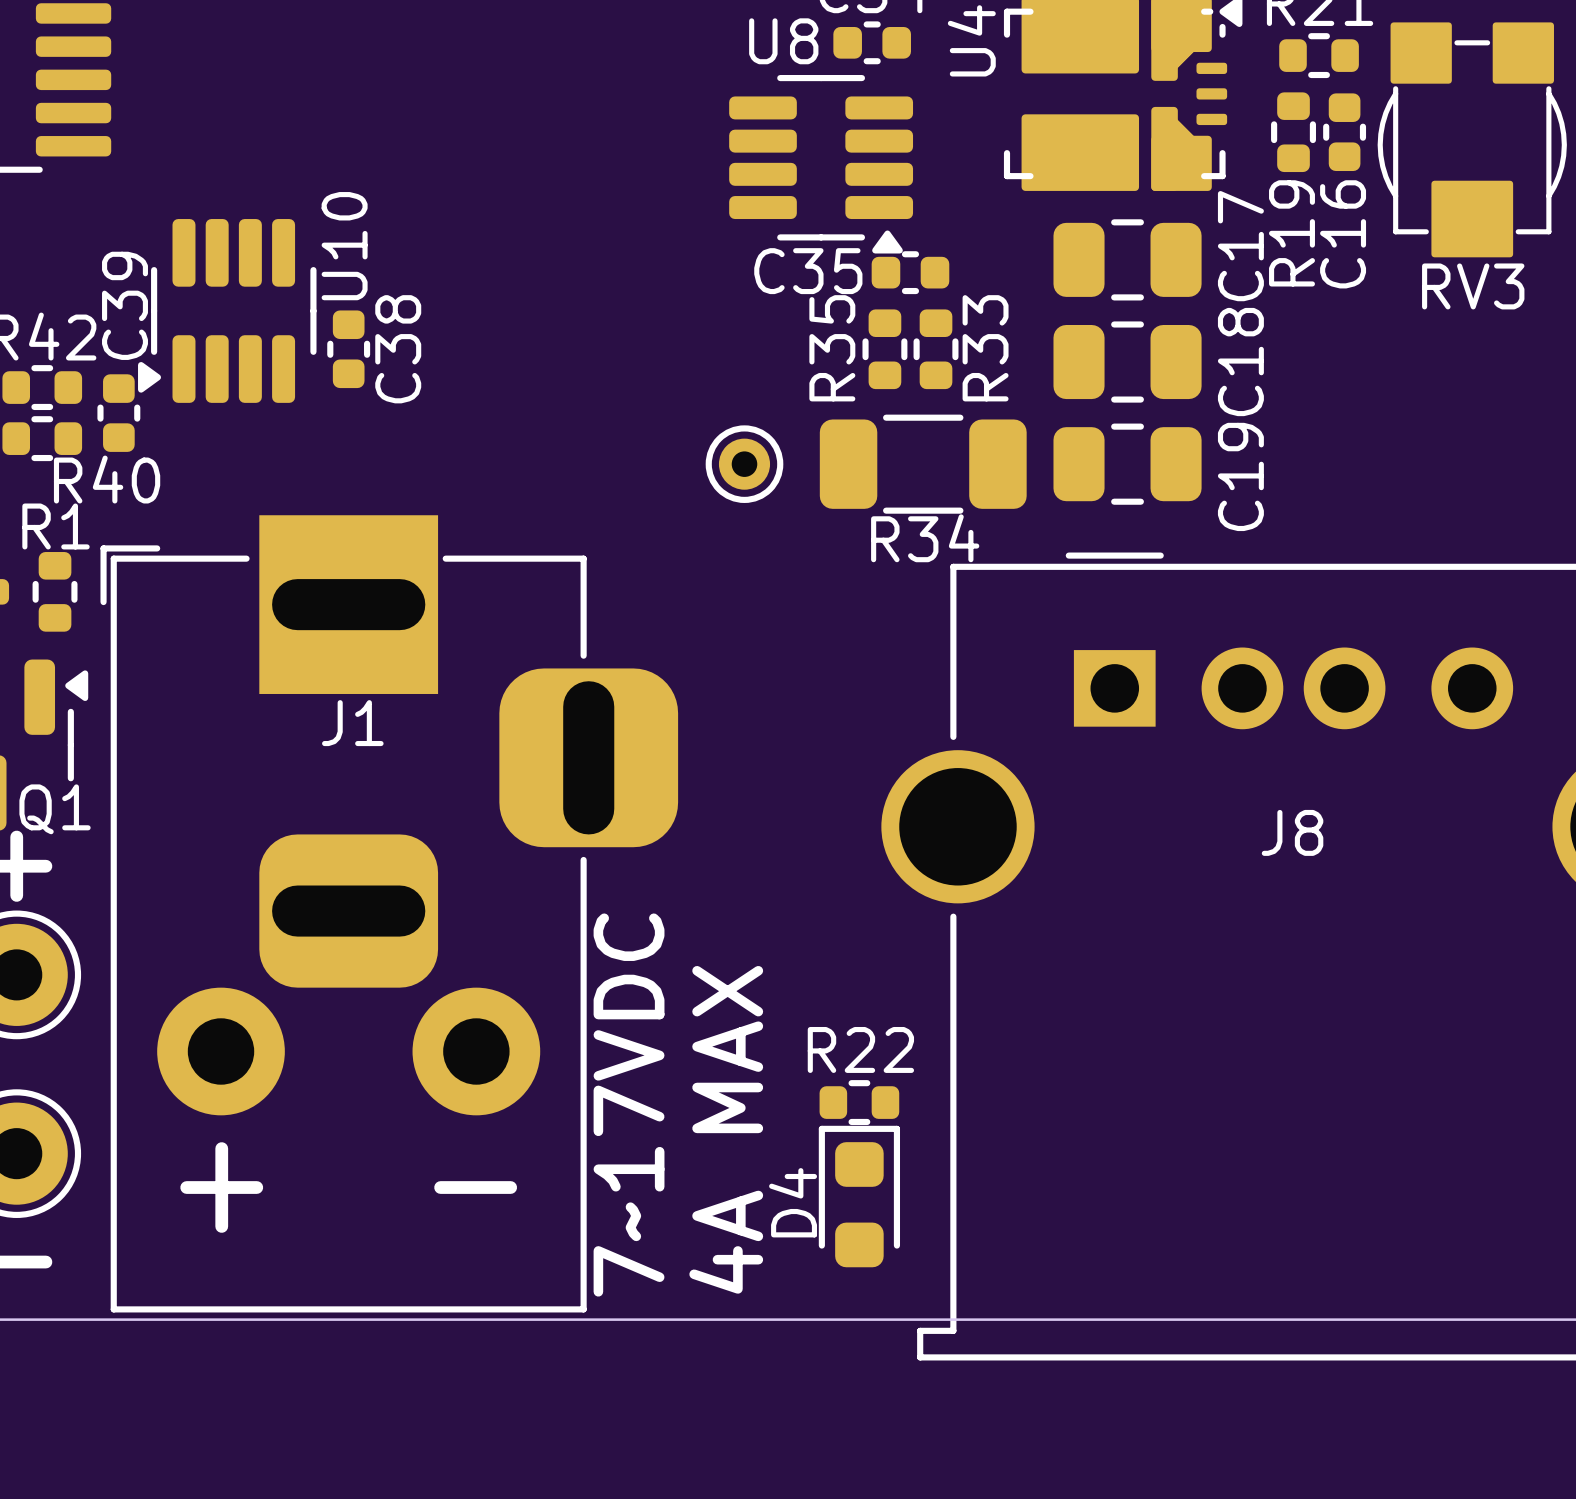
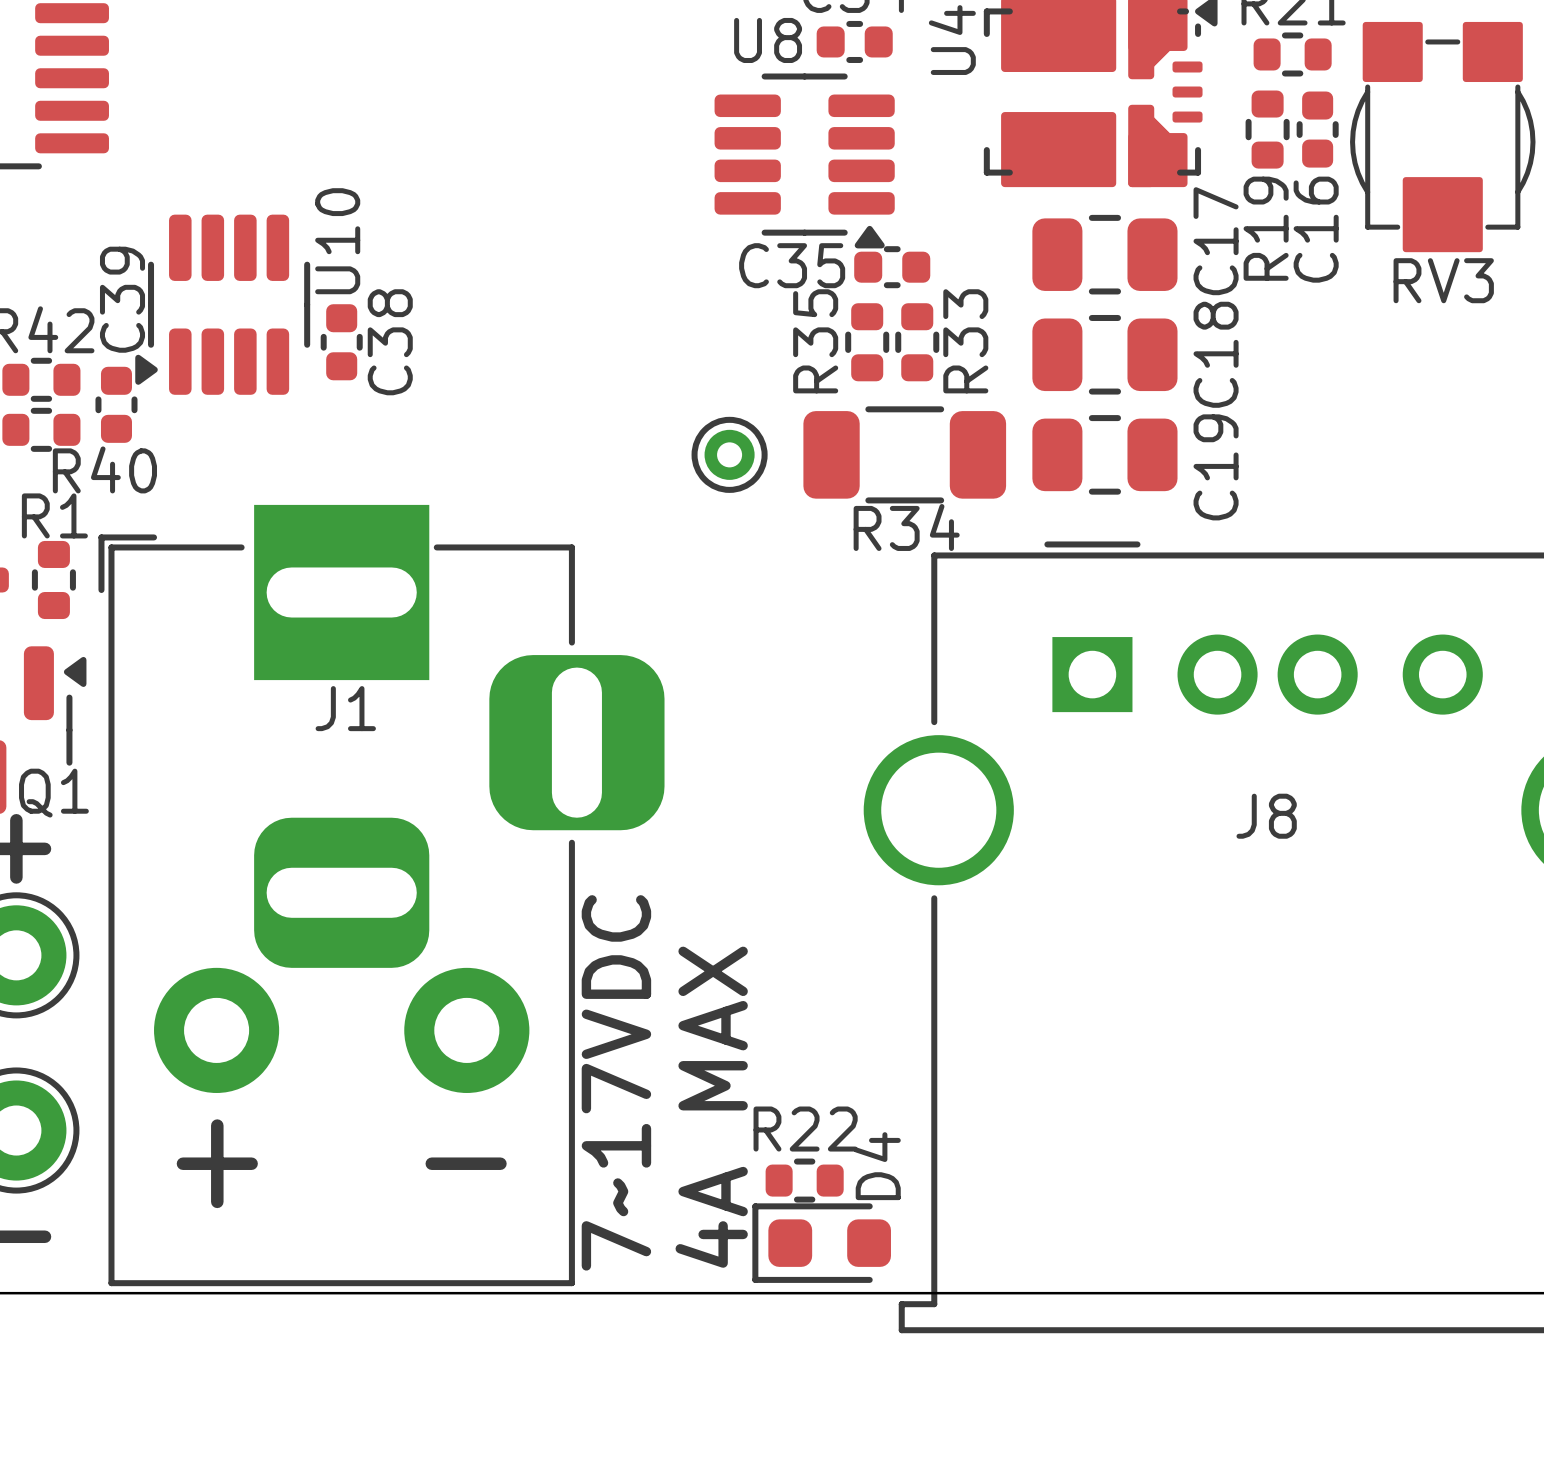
R22 position: (859, 1102) -> (804, 1180)
D4 rotation: 0° (859, 1196) -> 90° counterclockwise (821, 1243)
D4 name position: D4 (793, 1202) -> D4 (877, 1166)

